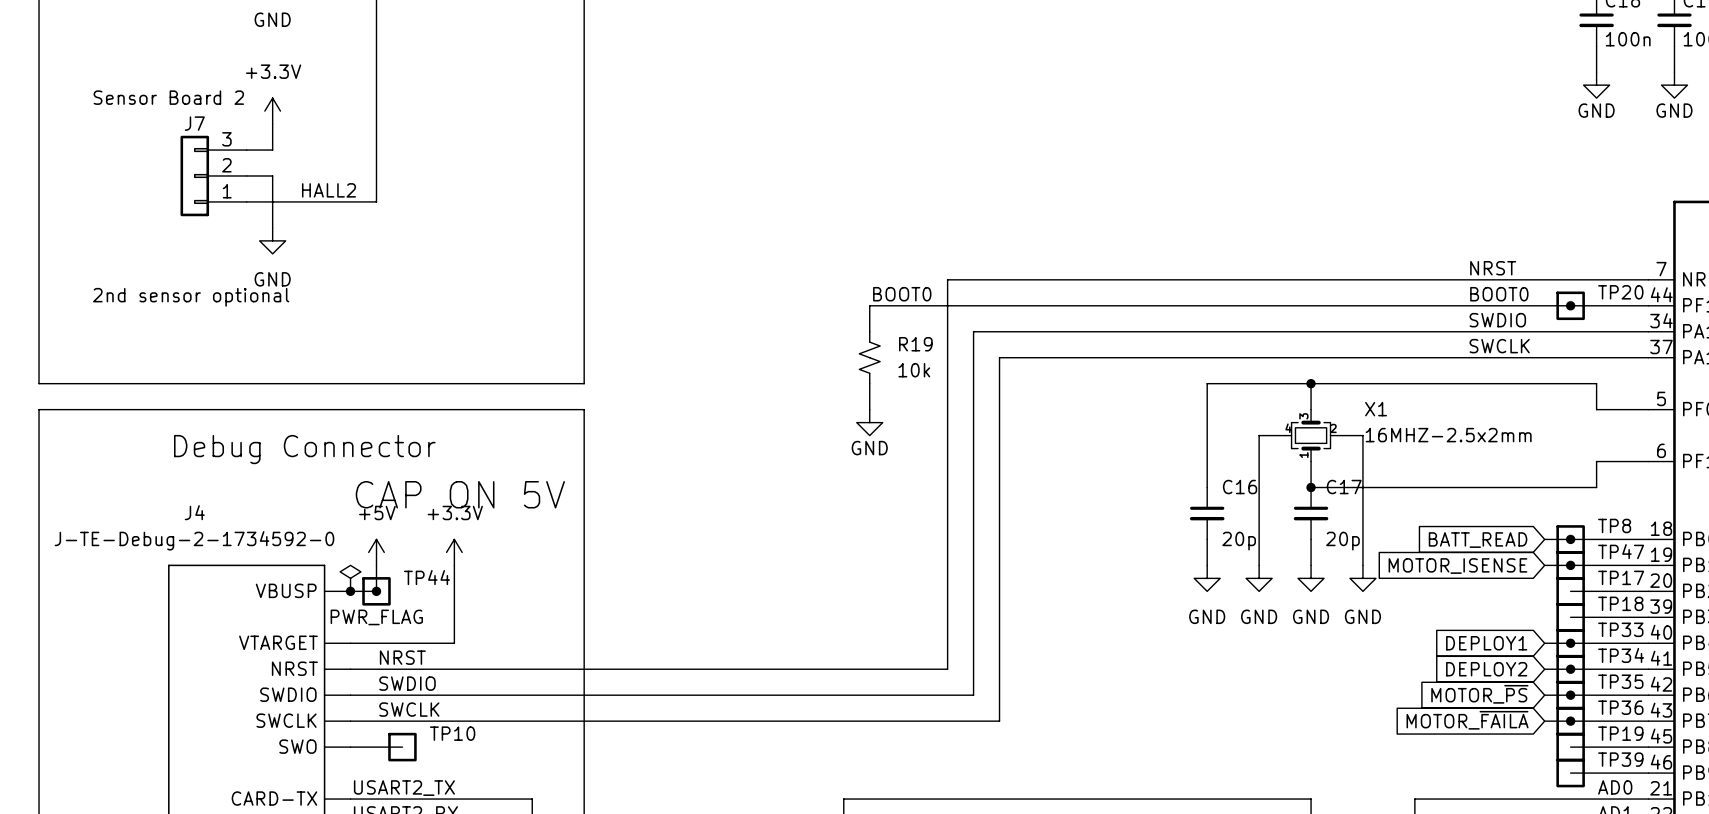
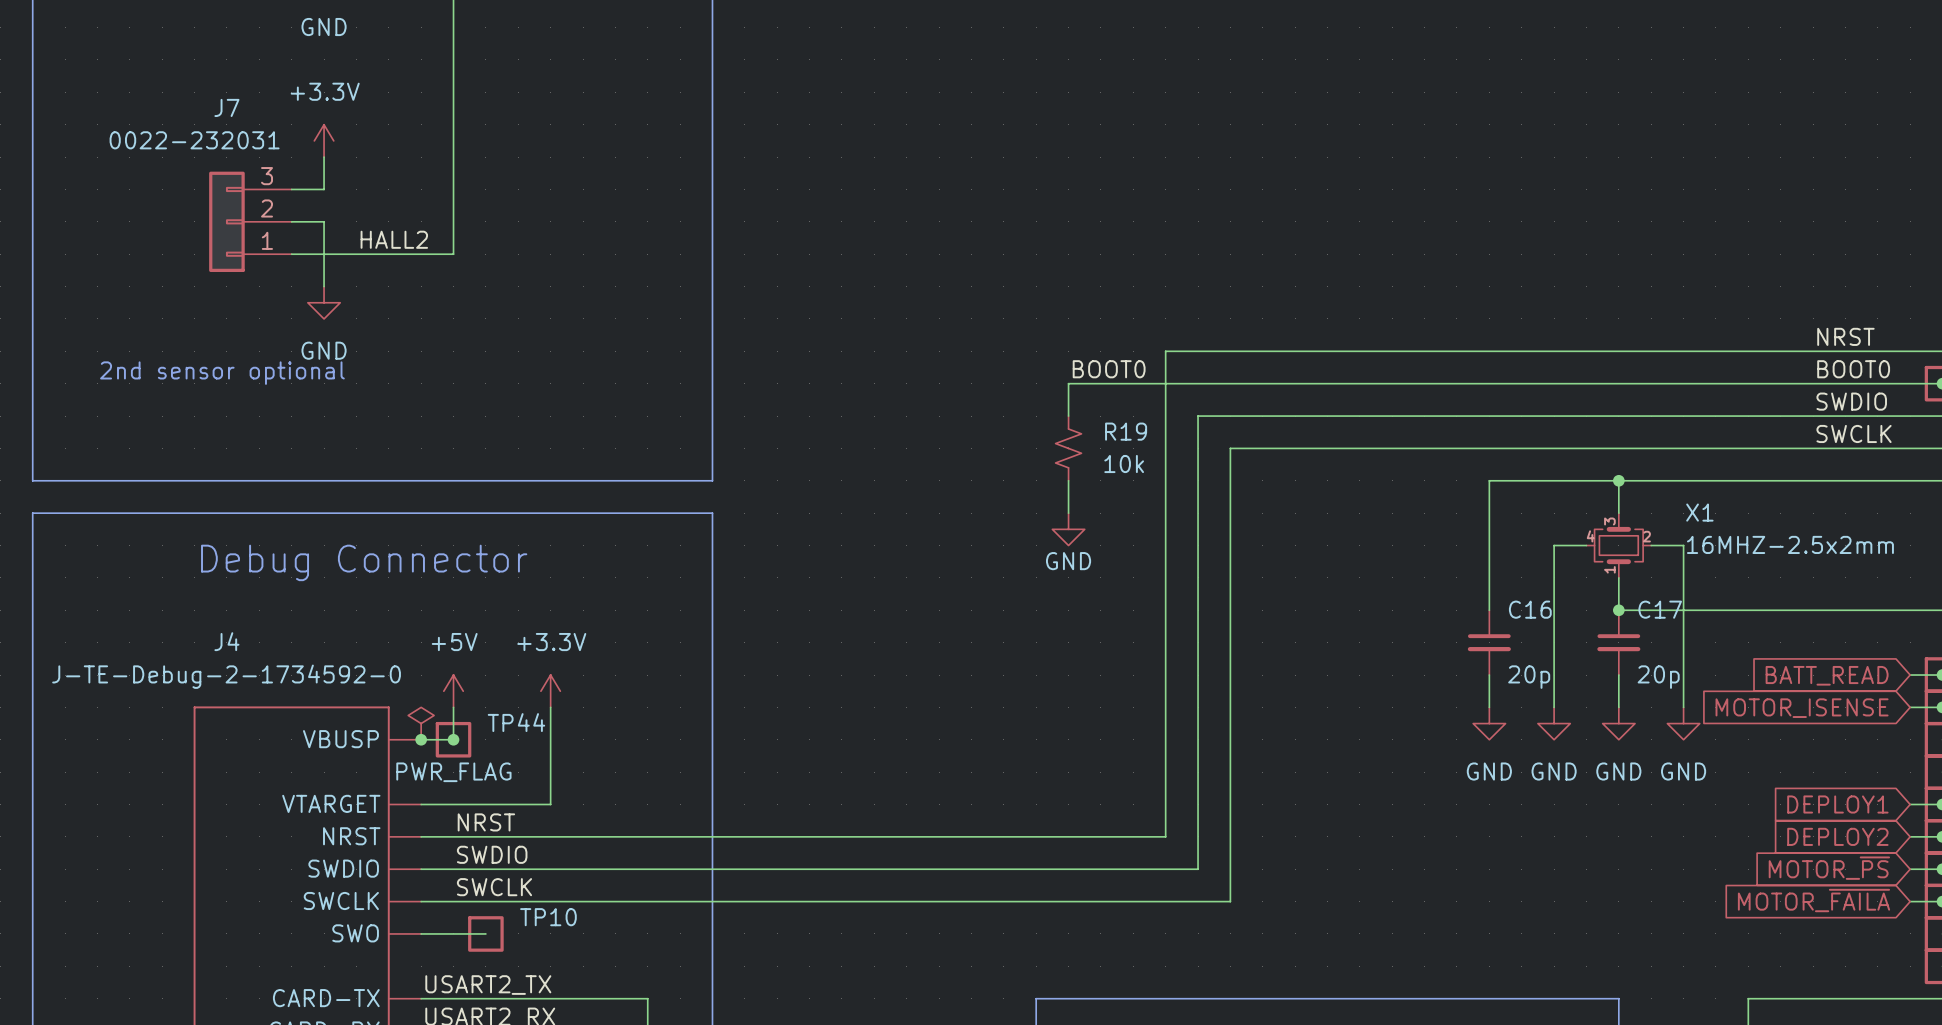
J7 value: Sensor Board 2 (168, 97) -> 0022-232031 (194, 140)
J7 name position: J7 (194, 123) -> J7 (226, 107)
text: CAP ON 5V (460, 494) -> none

